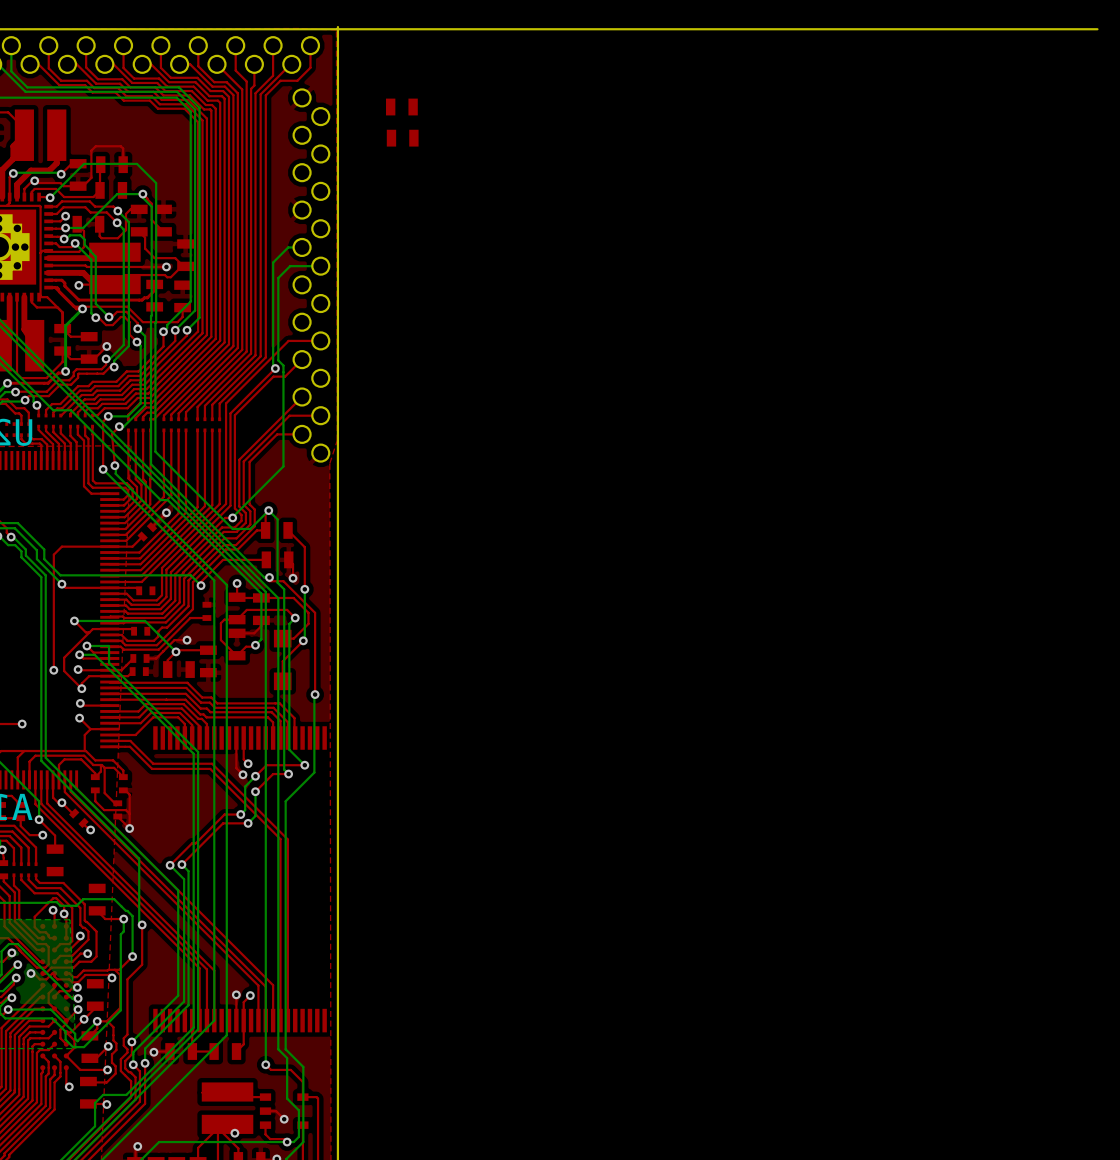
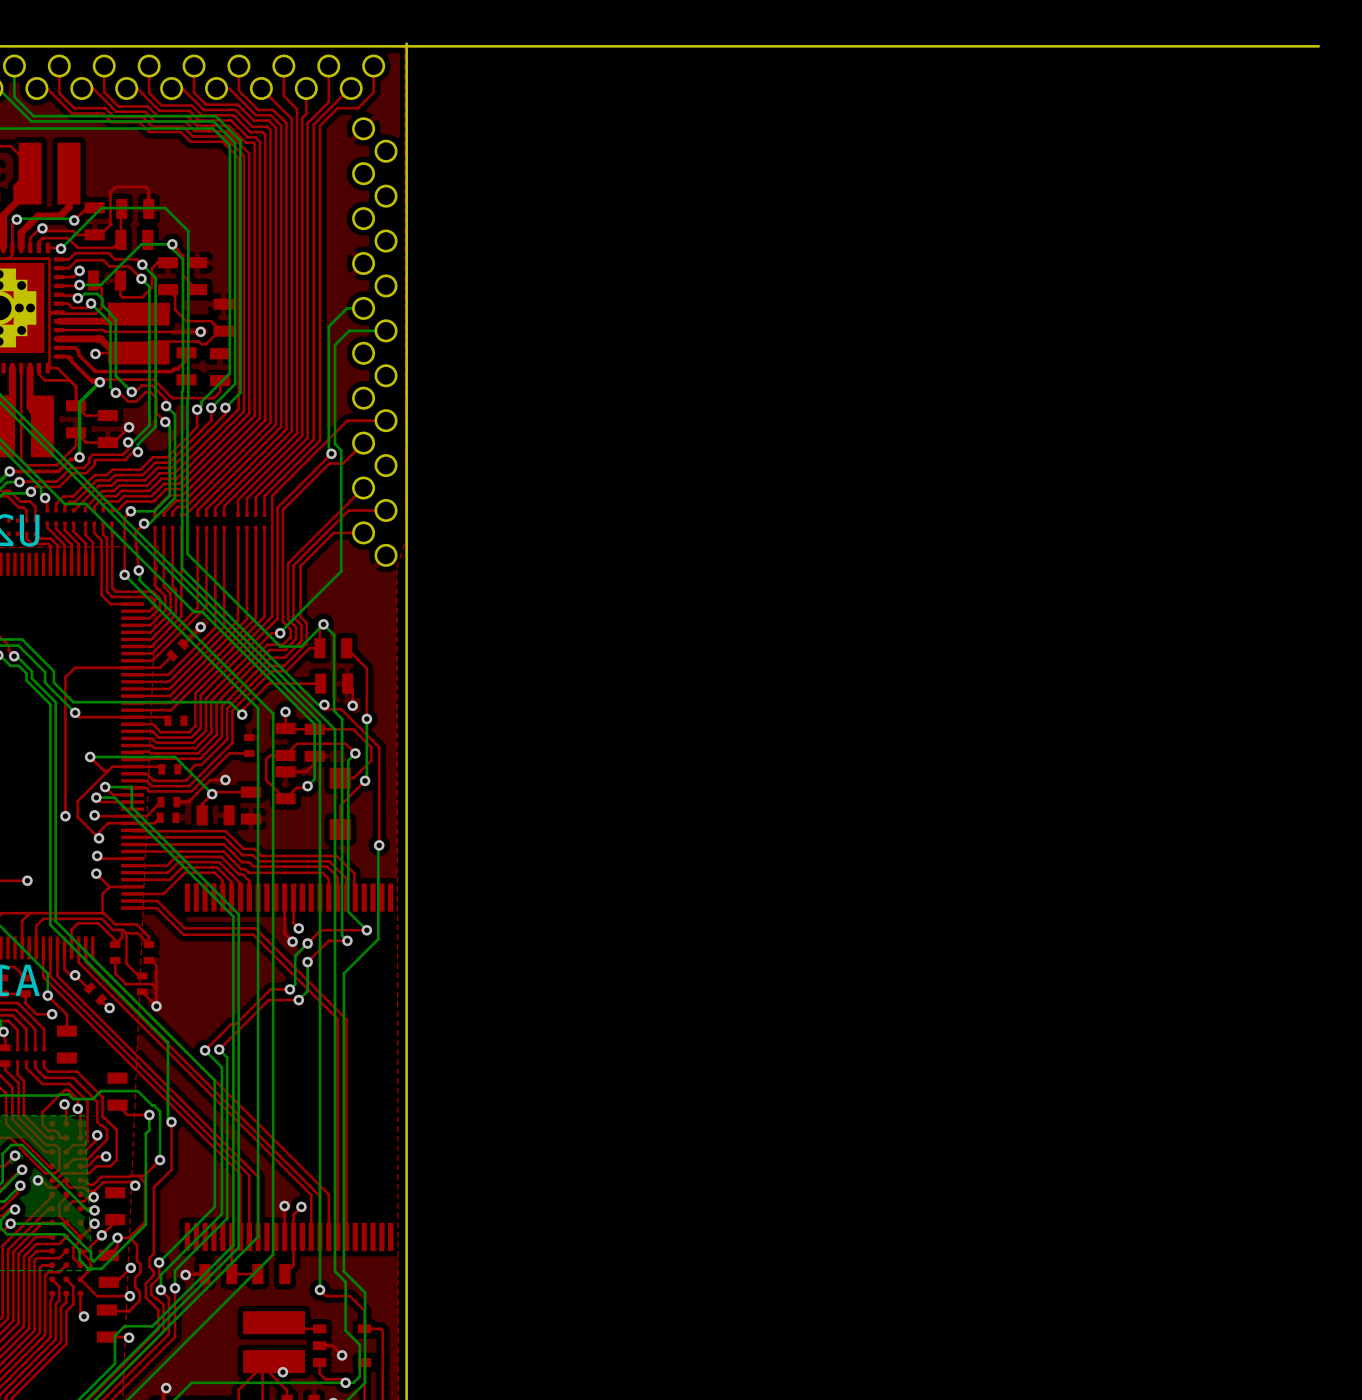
part: (401, 107) -> none
part: (402, 138) -> none

